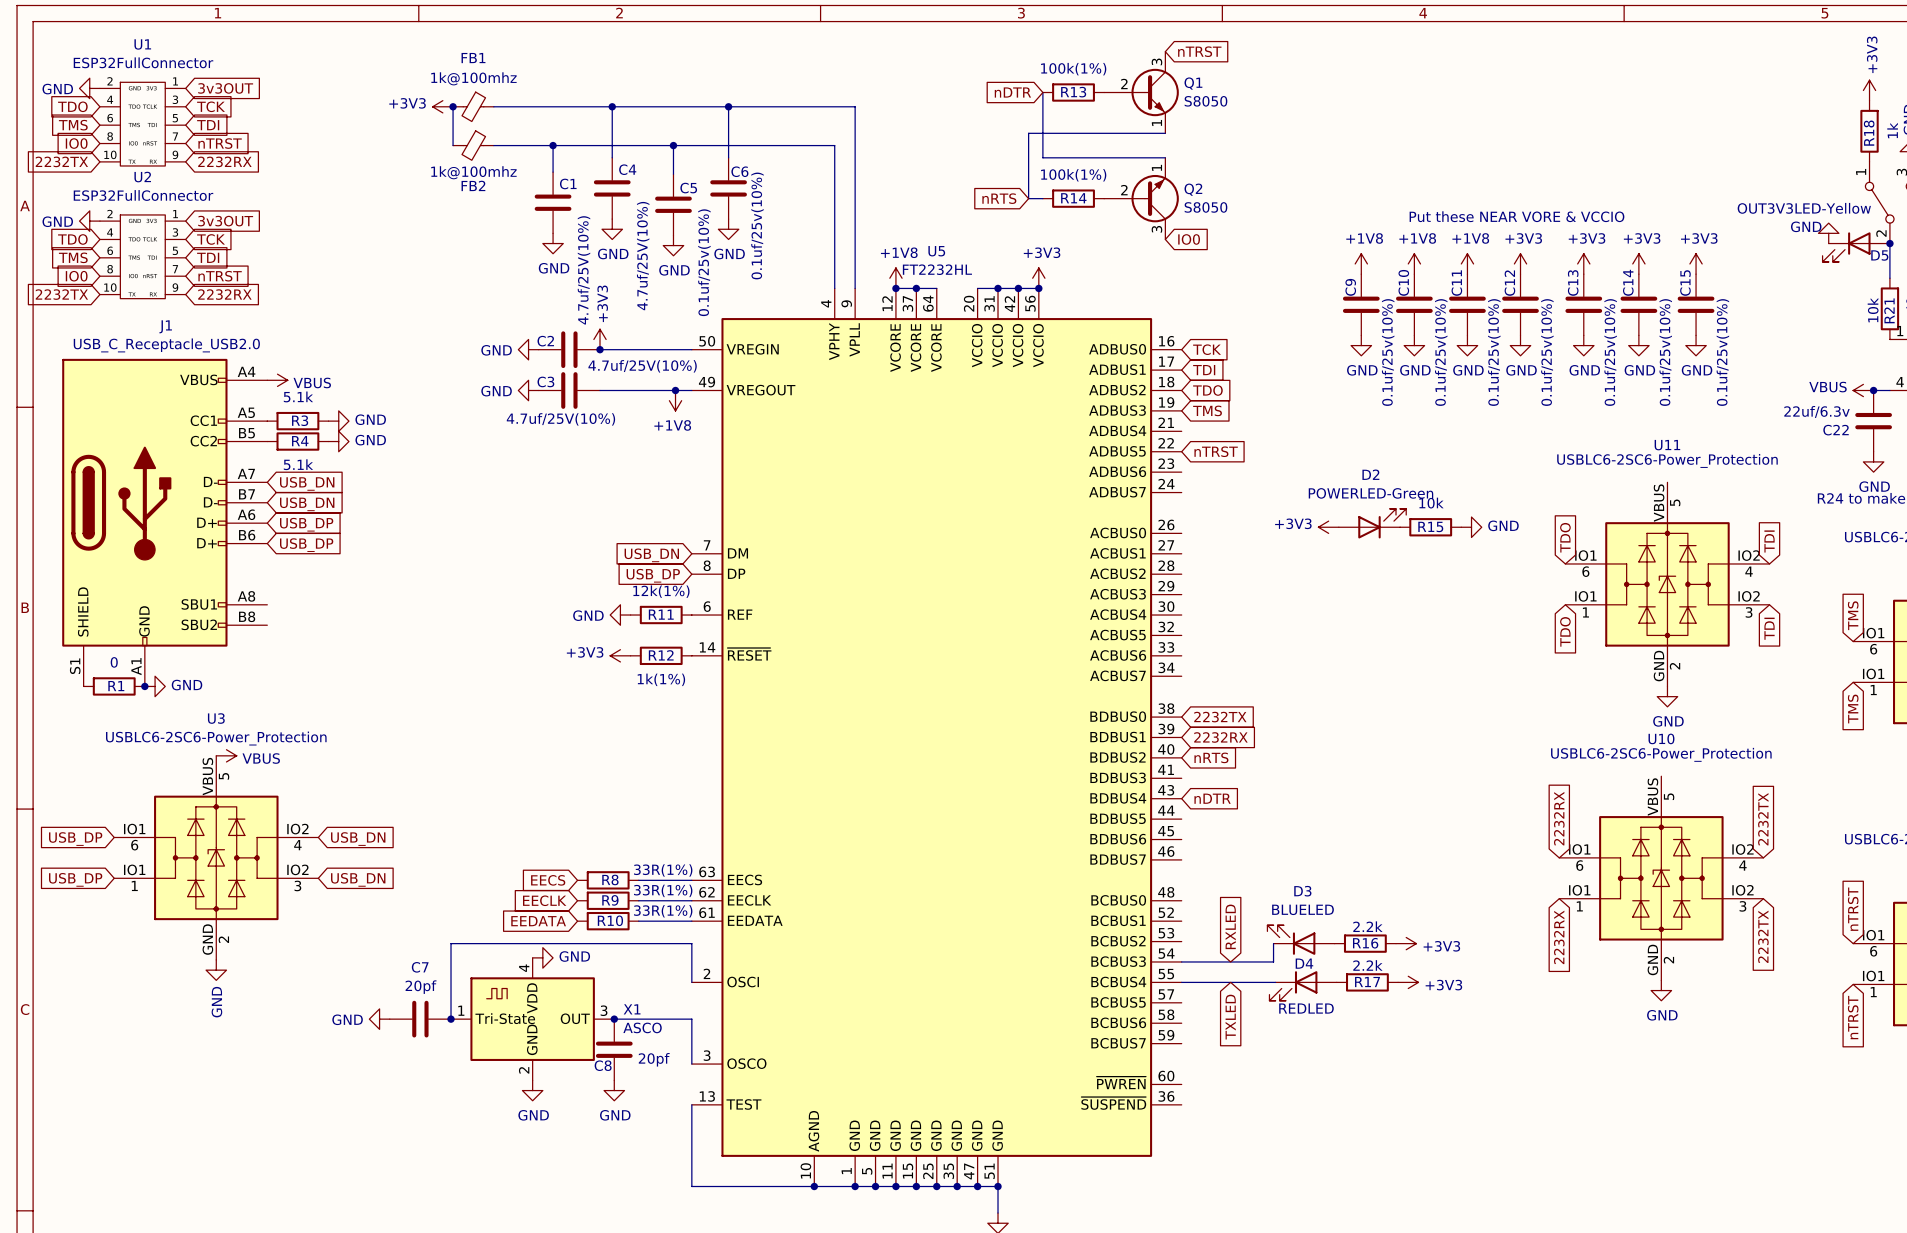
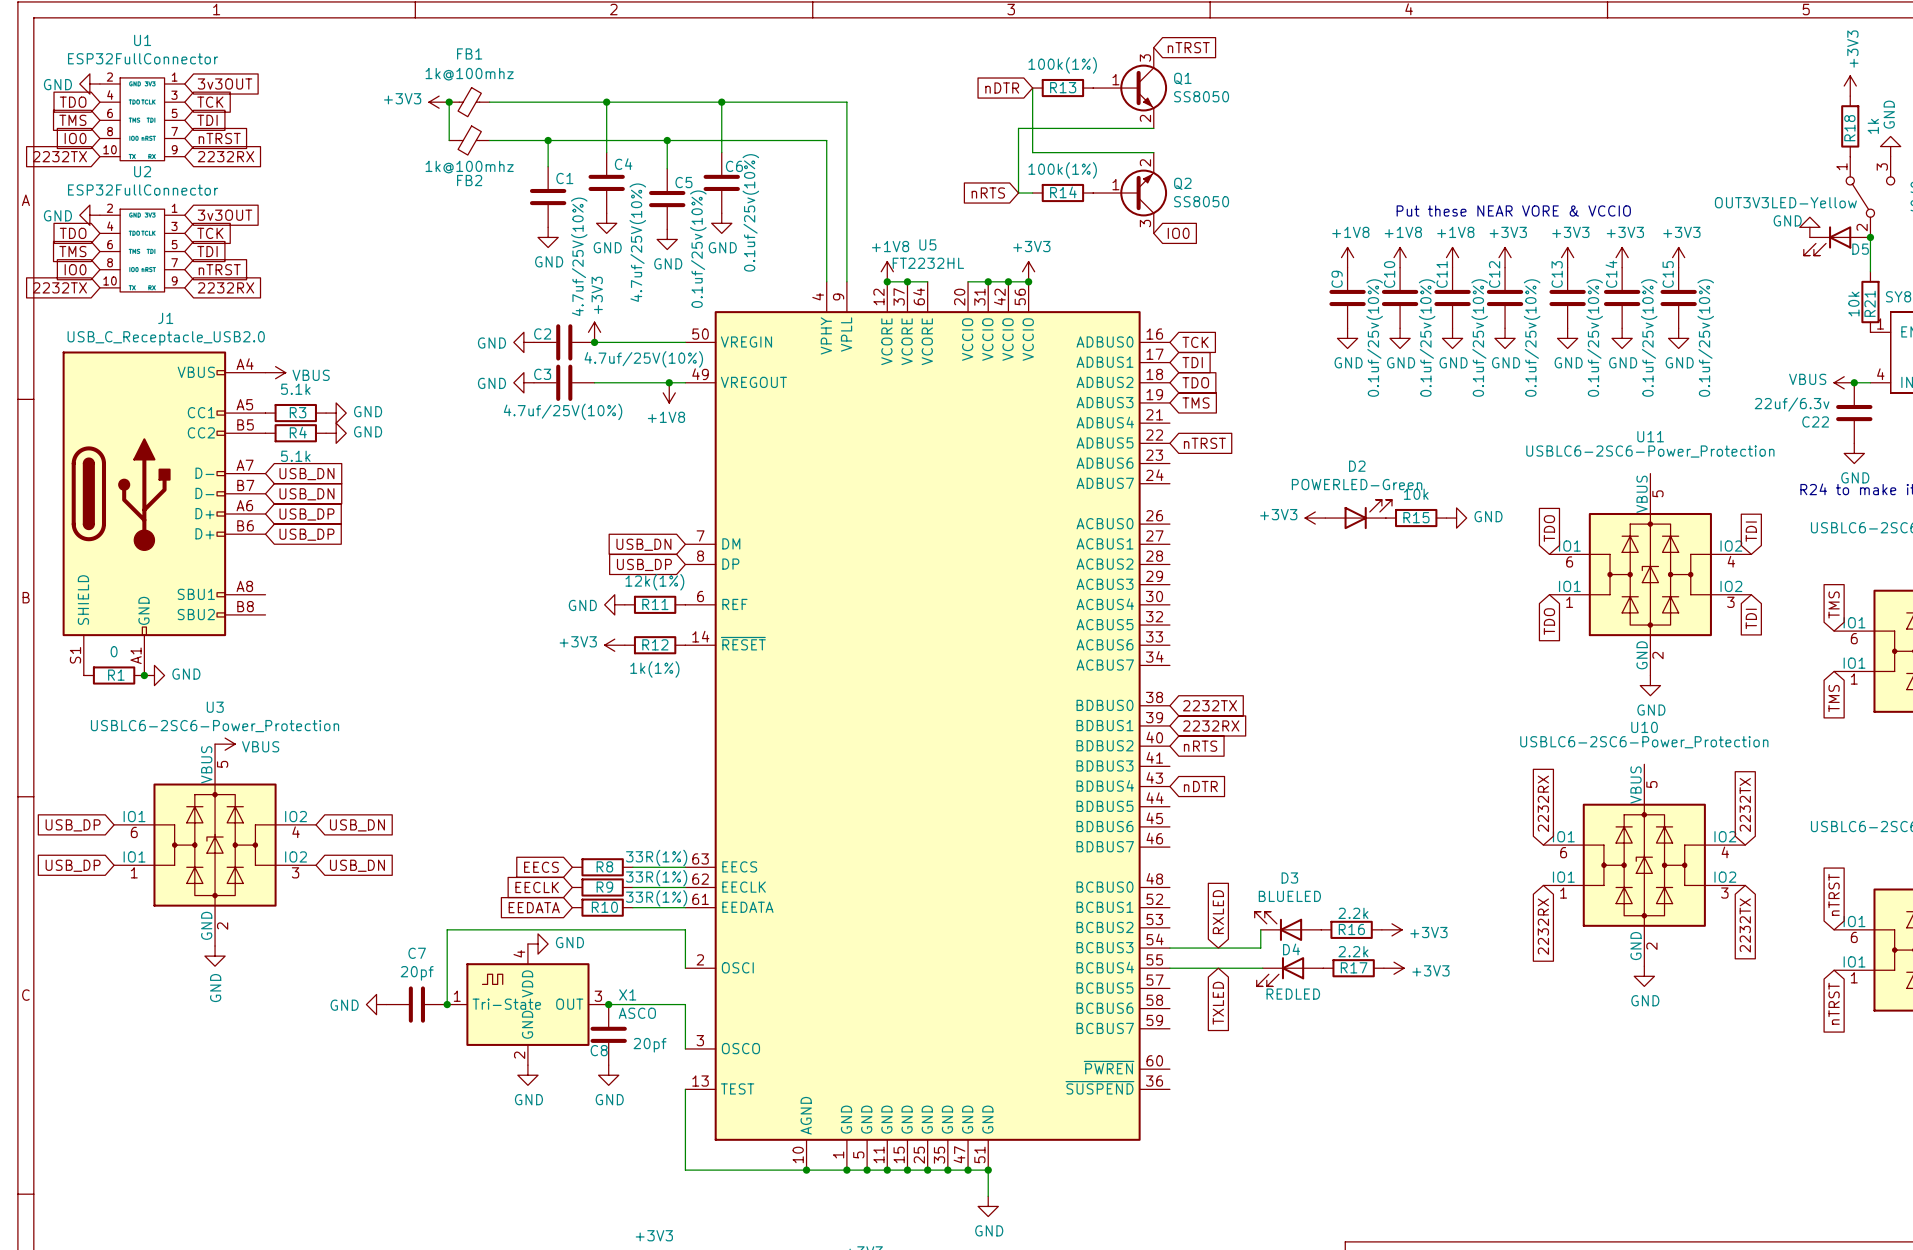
Q1 symbol: [1104, 51, 1179, 134] -> [1093, 47, 1168, 129]
Q1 value: S8050 (1205, 101) -> SS8050 (1201, 96)
Q2 symbol: [1104, 157, 1179, 240] -> [1093, 152, 1168, 234]
Q2 value: S8050 (1205, 207) -> SS8050 (1201, 201)

